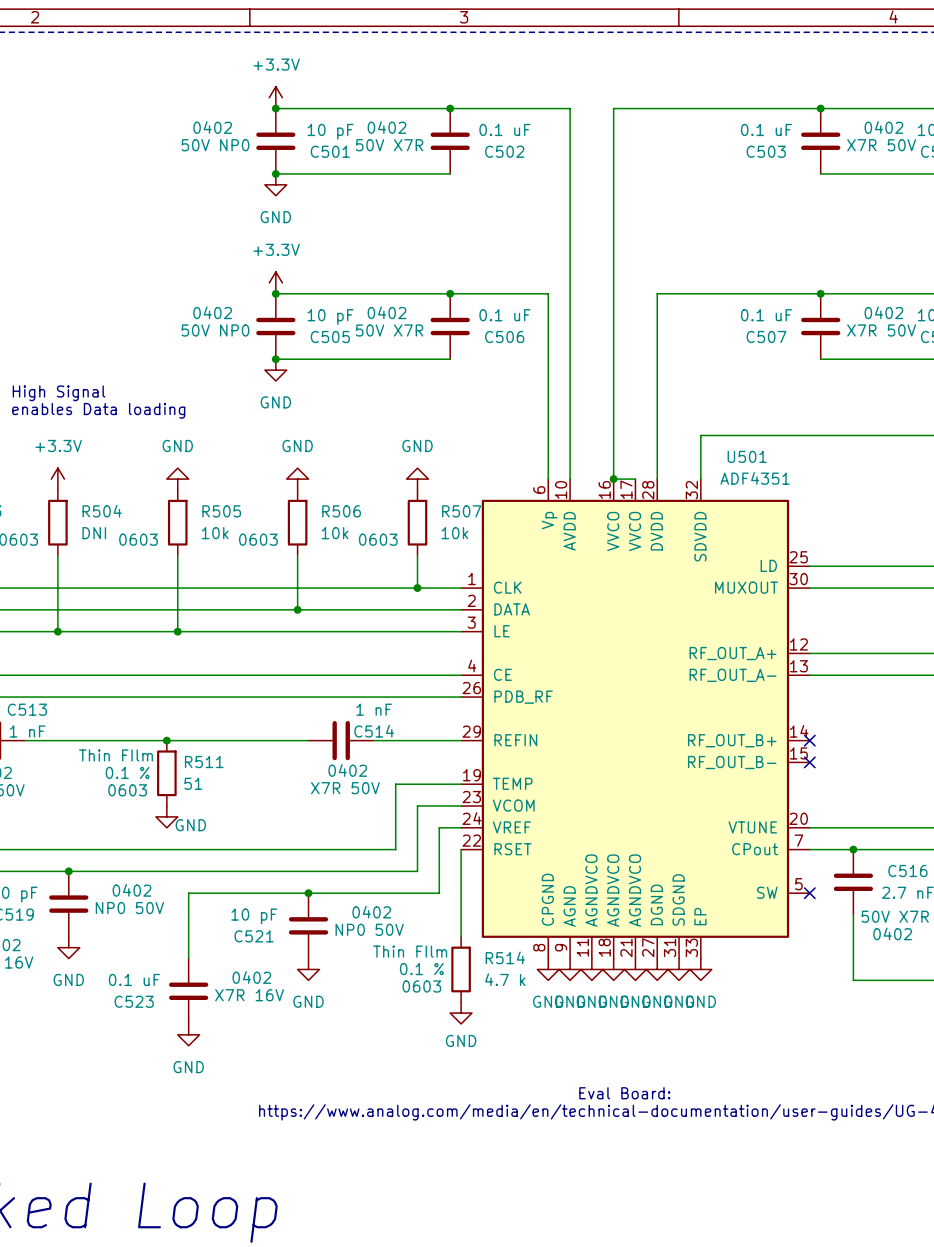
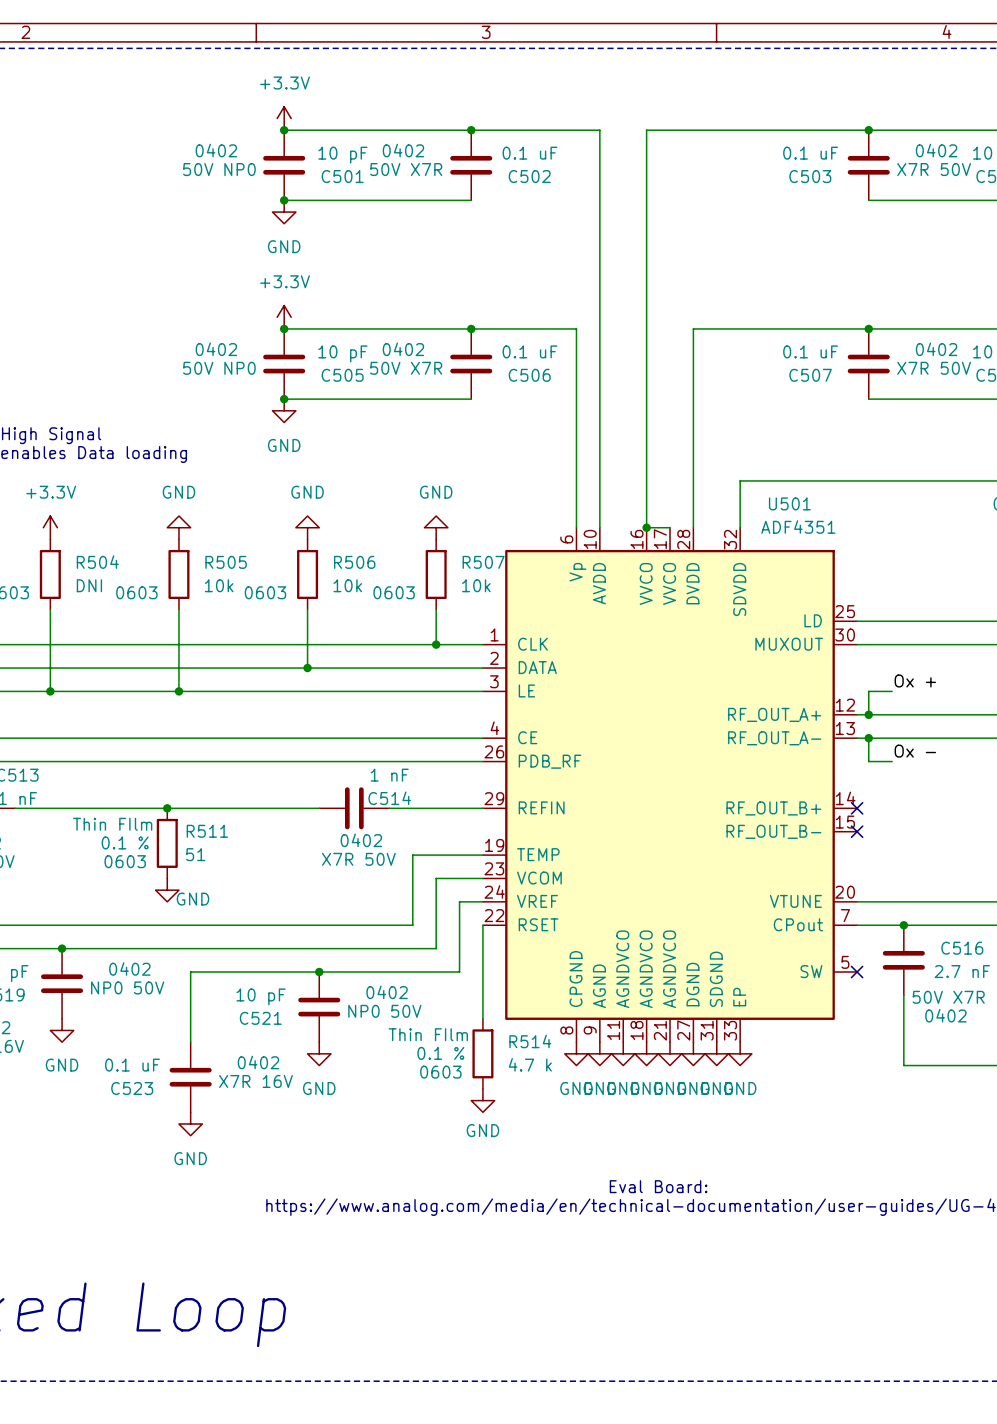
label: none -> Ox + (915, 680)
wire: none -> (892, 691) (868, 691) (868, 714)
junction: none -> (868, 714)
wire: none -> (868, 738) (868, 761) (892, 761)
junction: none -> (868, 738)
label: none -> Ox - (915, 751)

